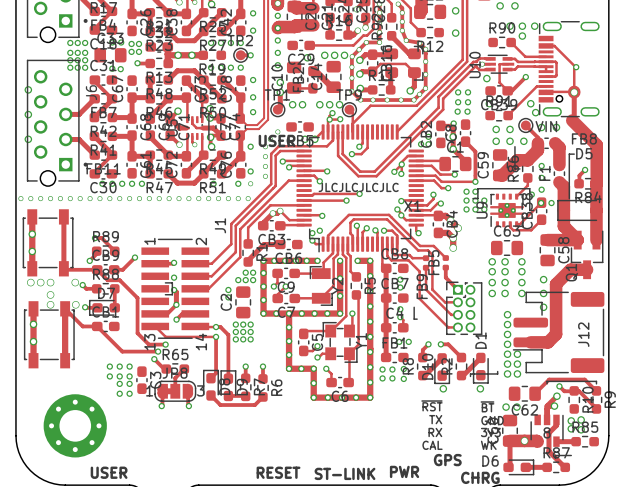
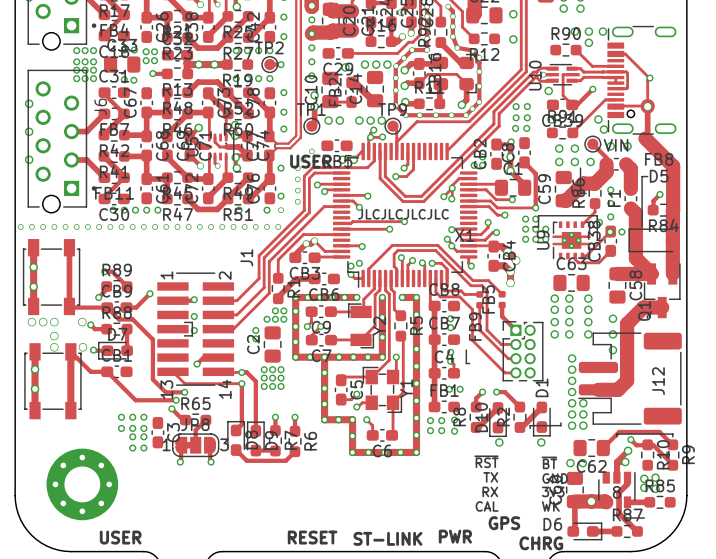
track: (174, 289) (176, 292) (176, 304) (167, 313) (155, 313) -> none
via: (176, 304) -> none

